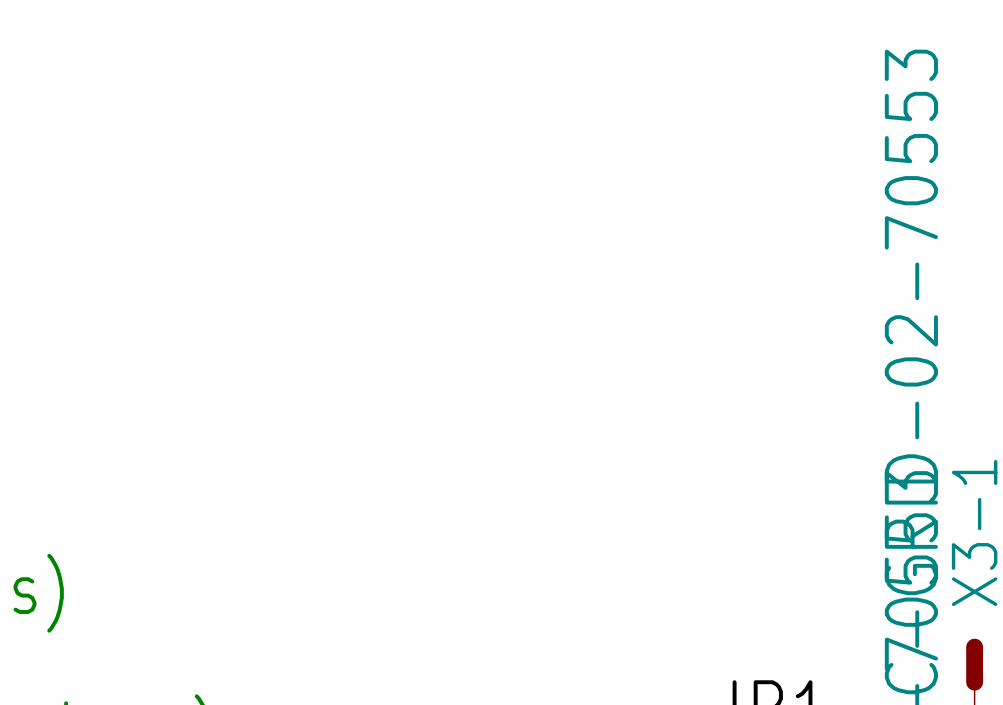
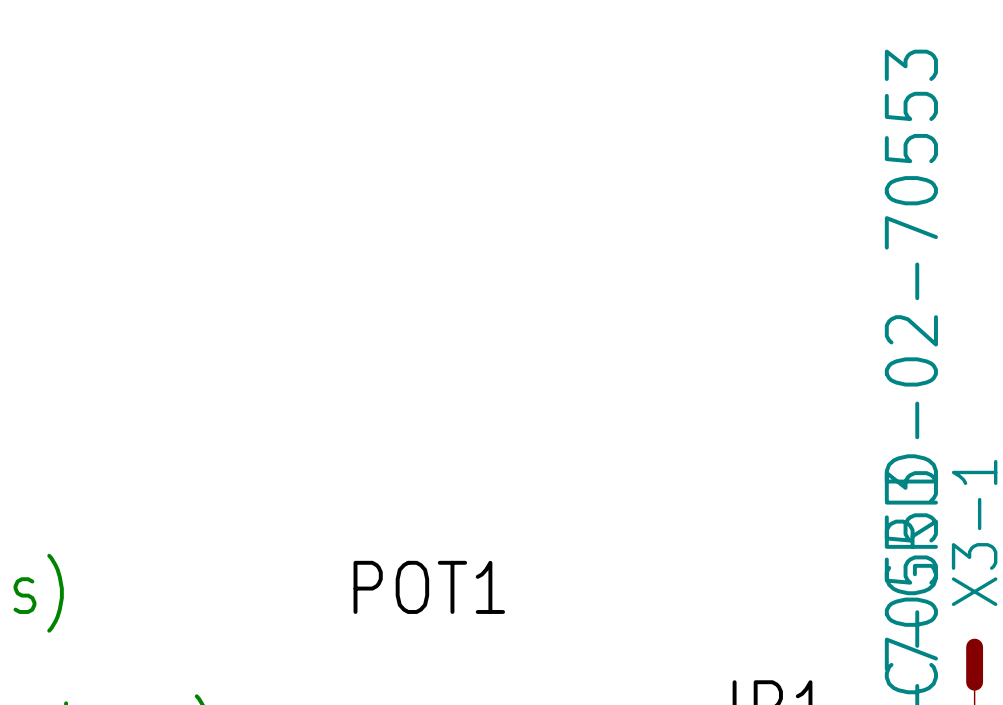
label: none -> POT1 (429, 587)

